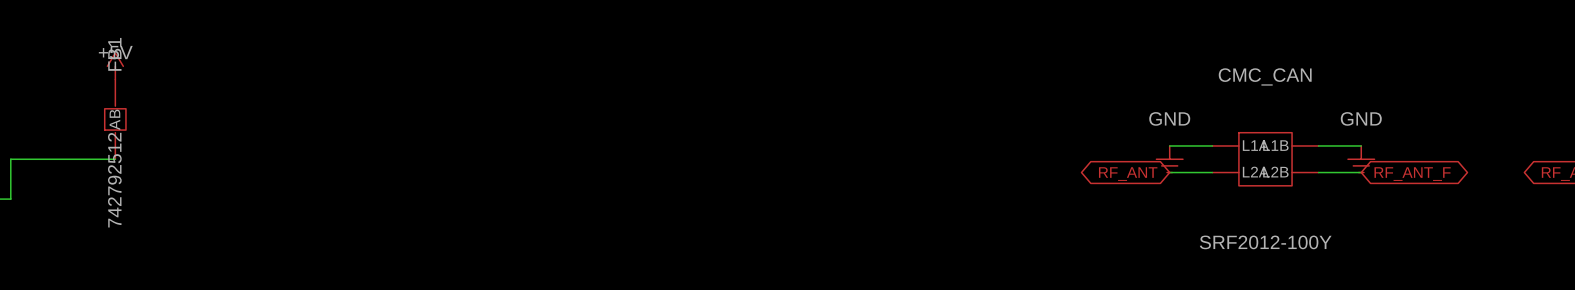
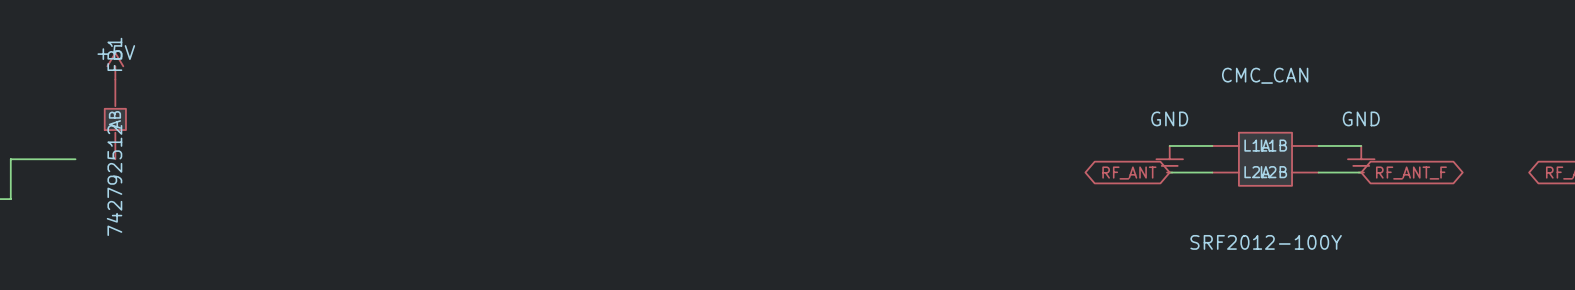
wire: (75, 159) (115, 159) -> none

